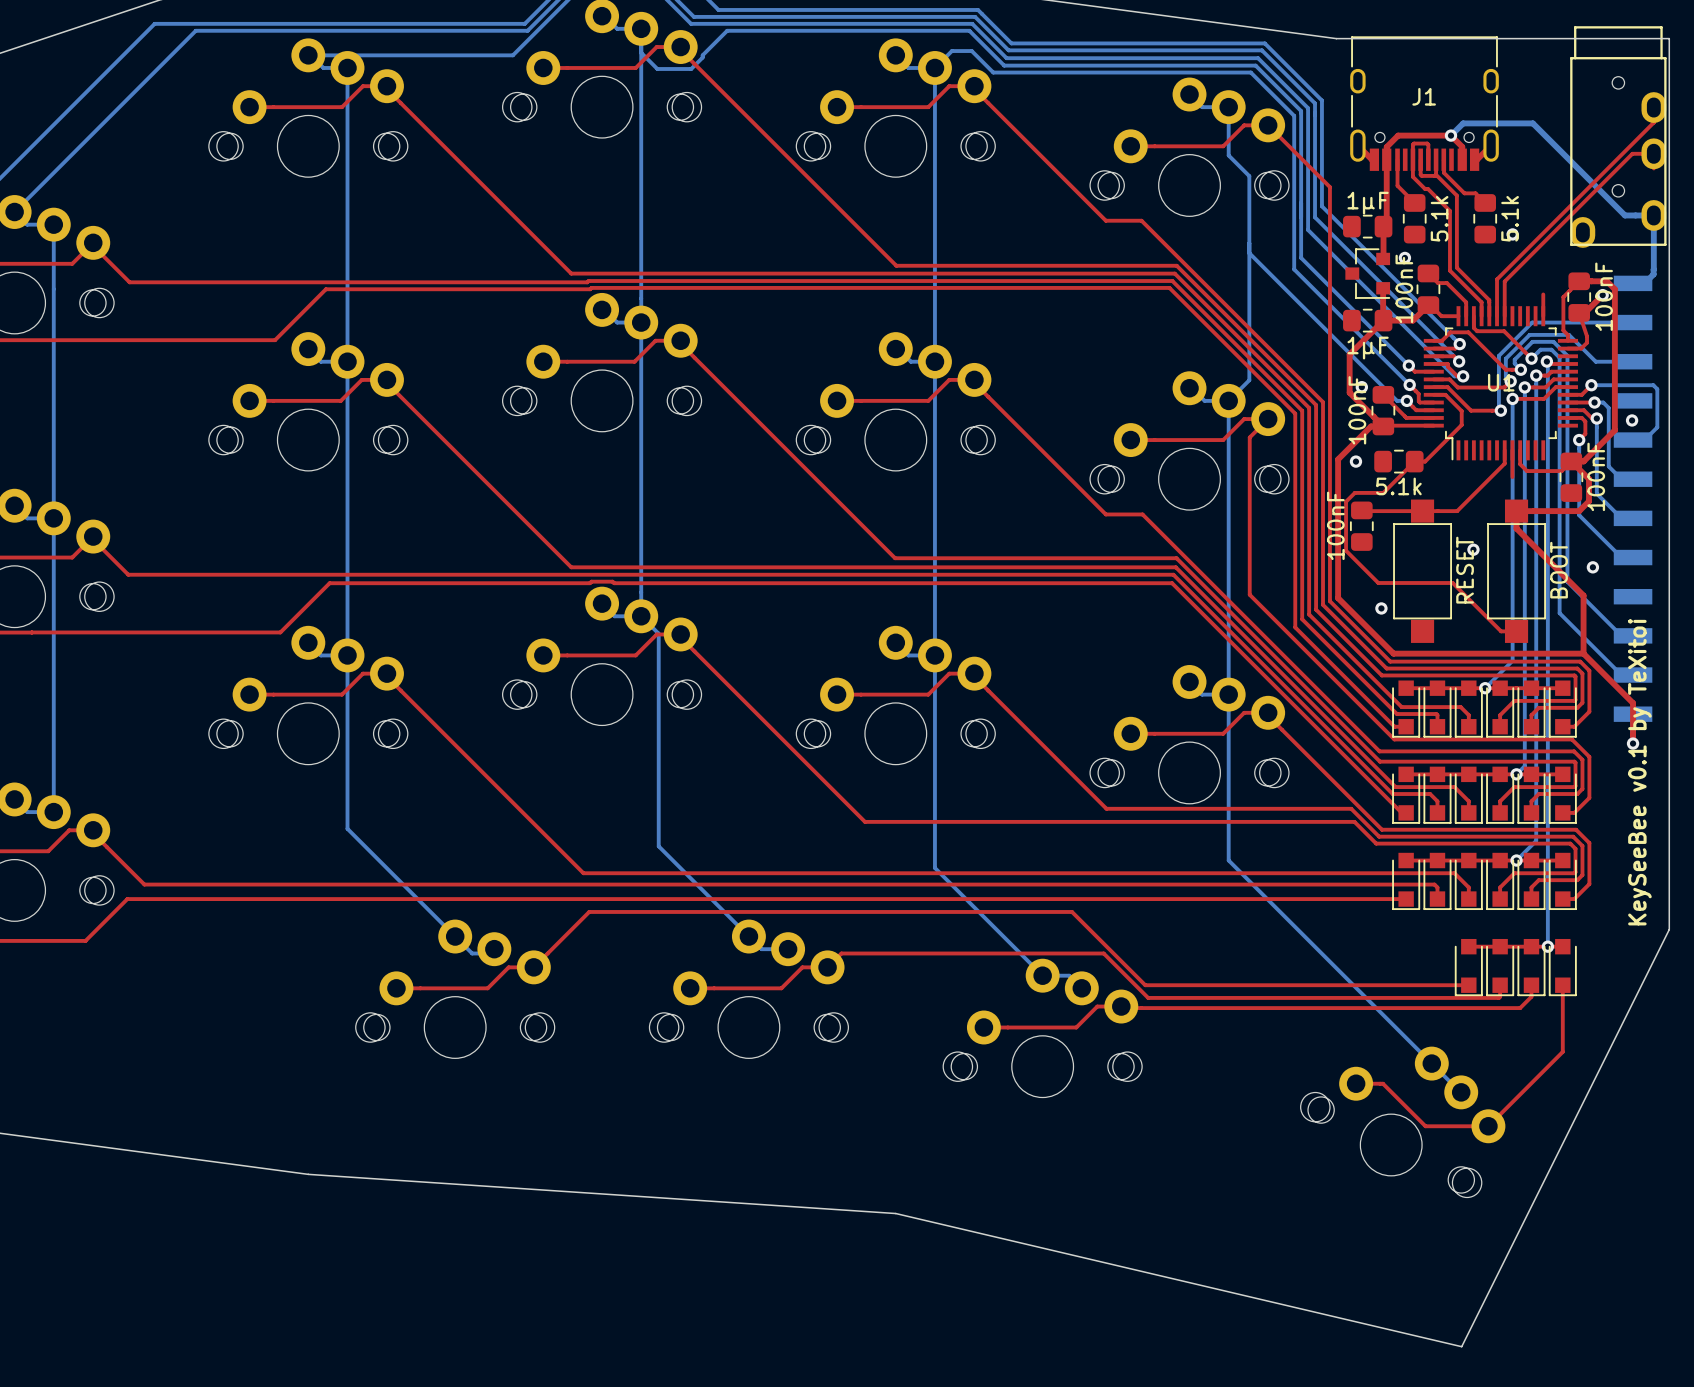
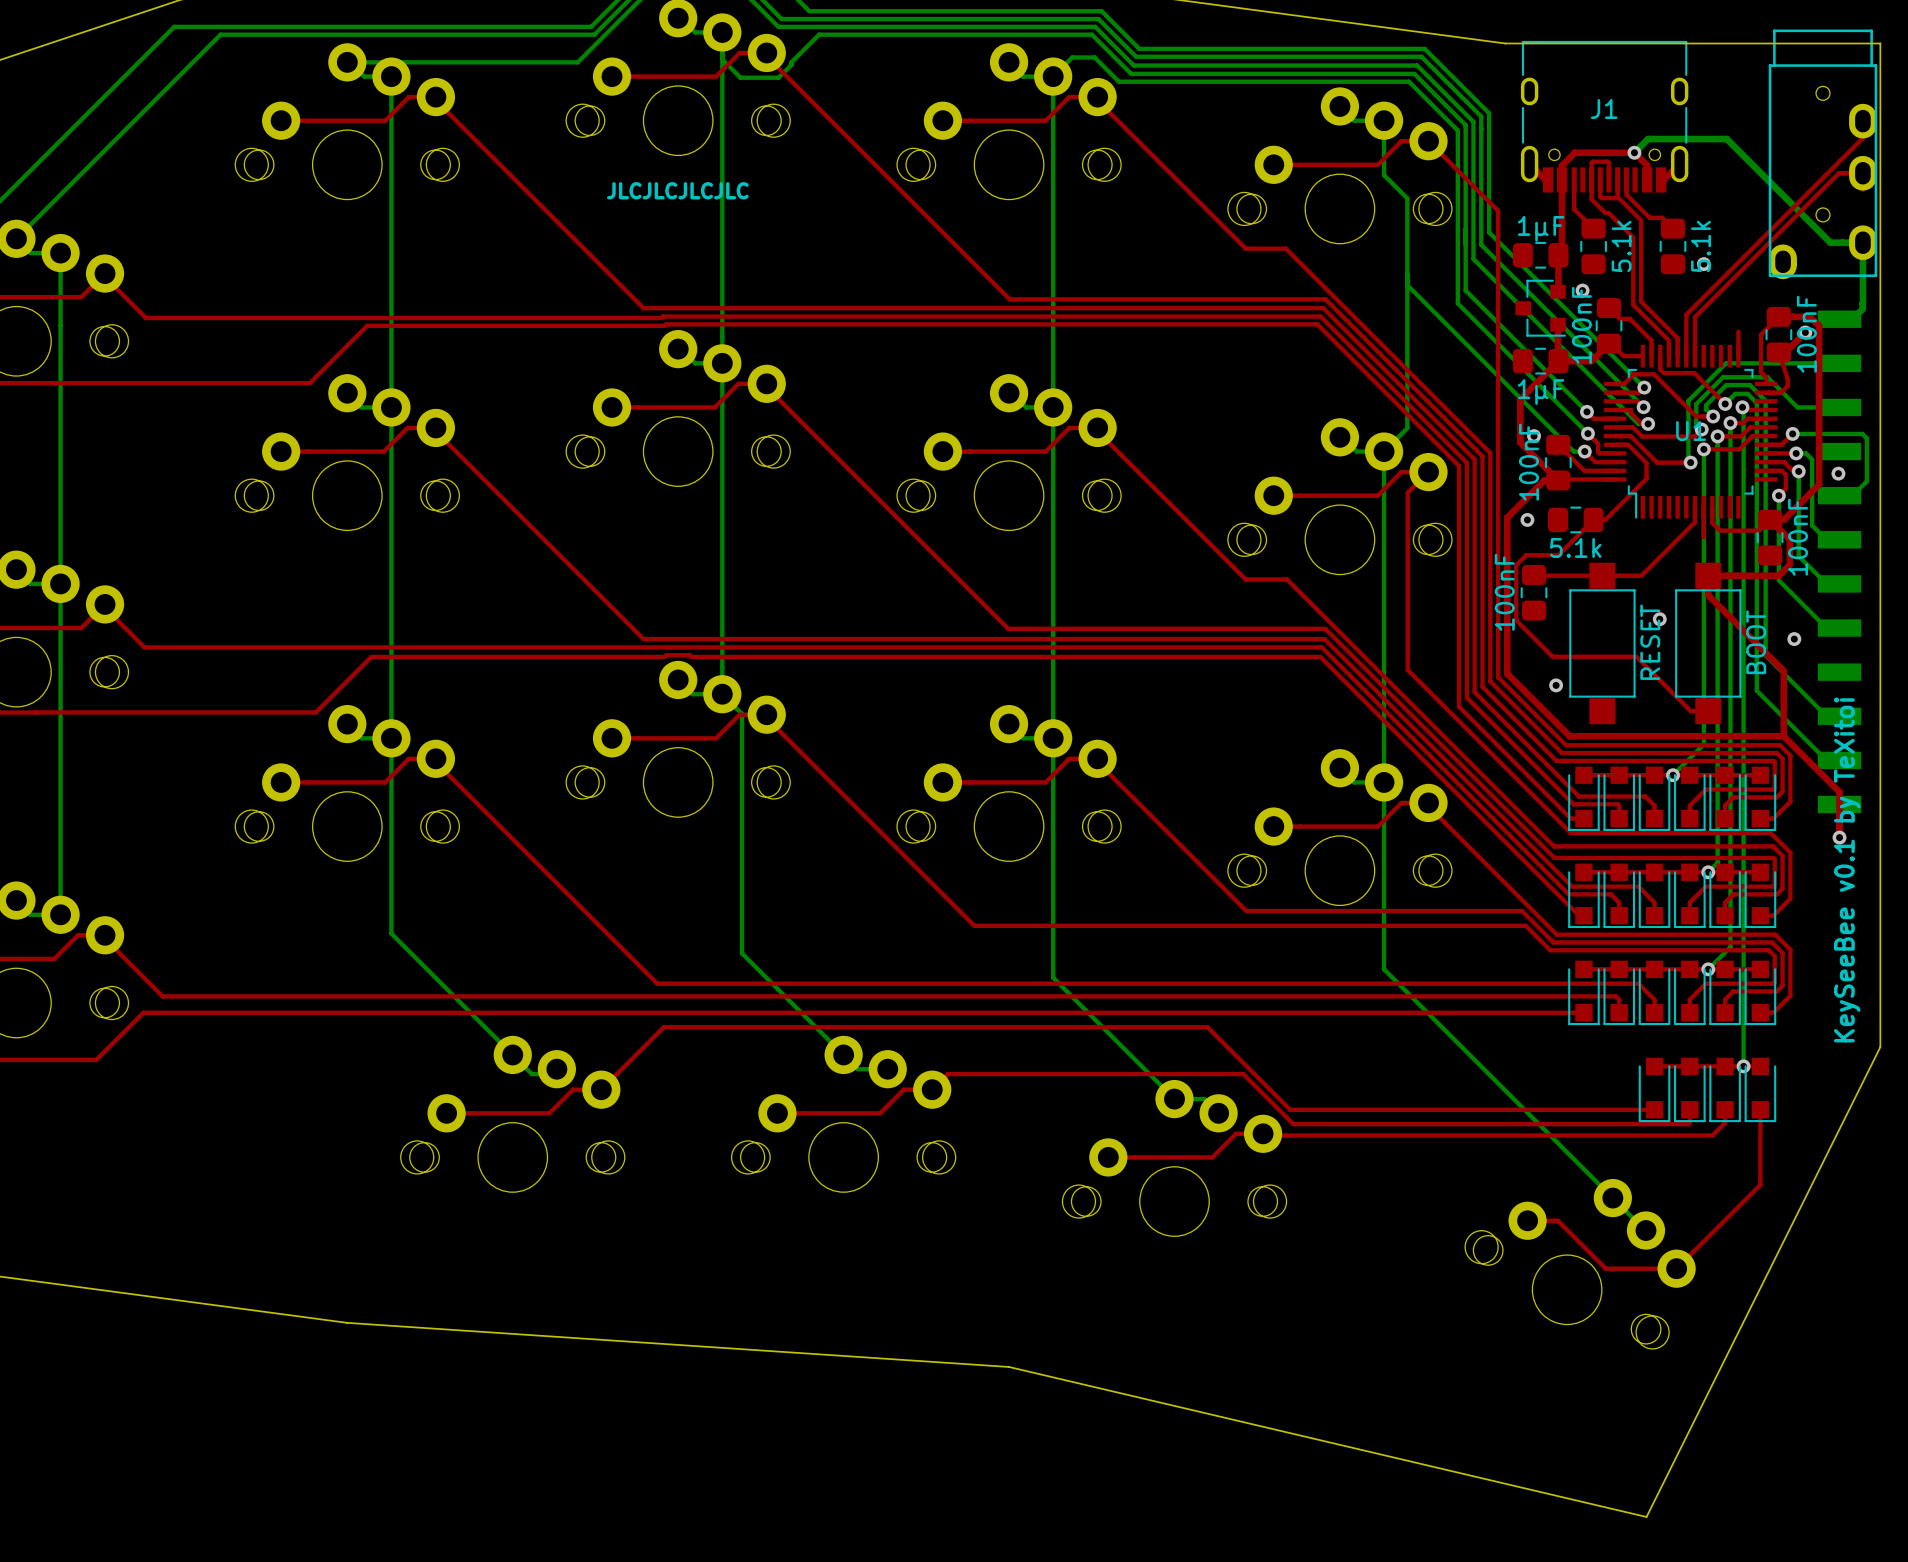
text: none -> JLCJLCJLCJLC (677, 190)

